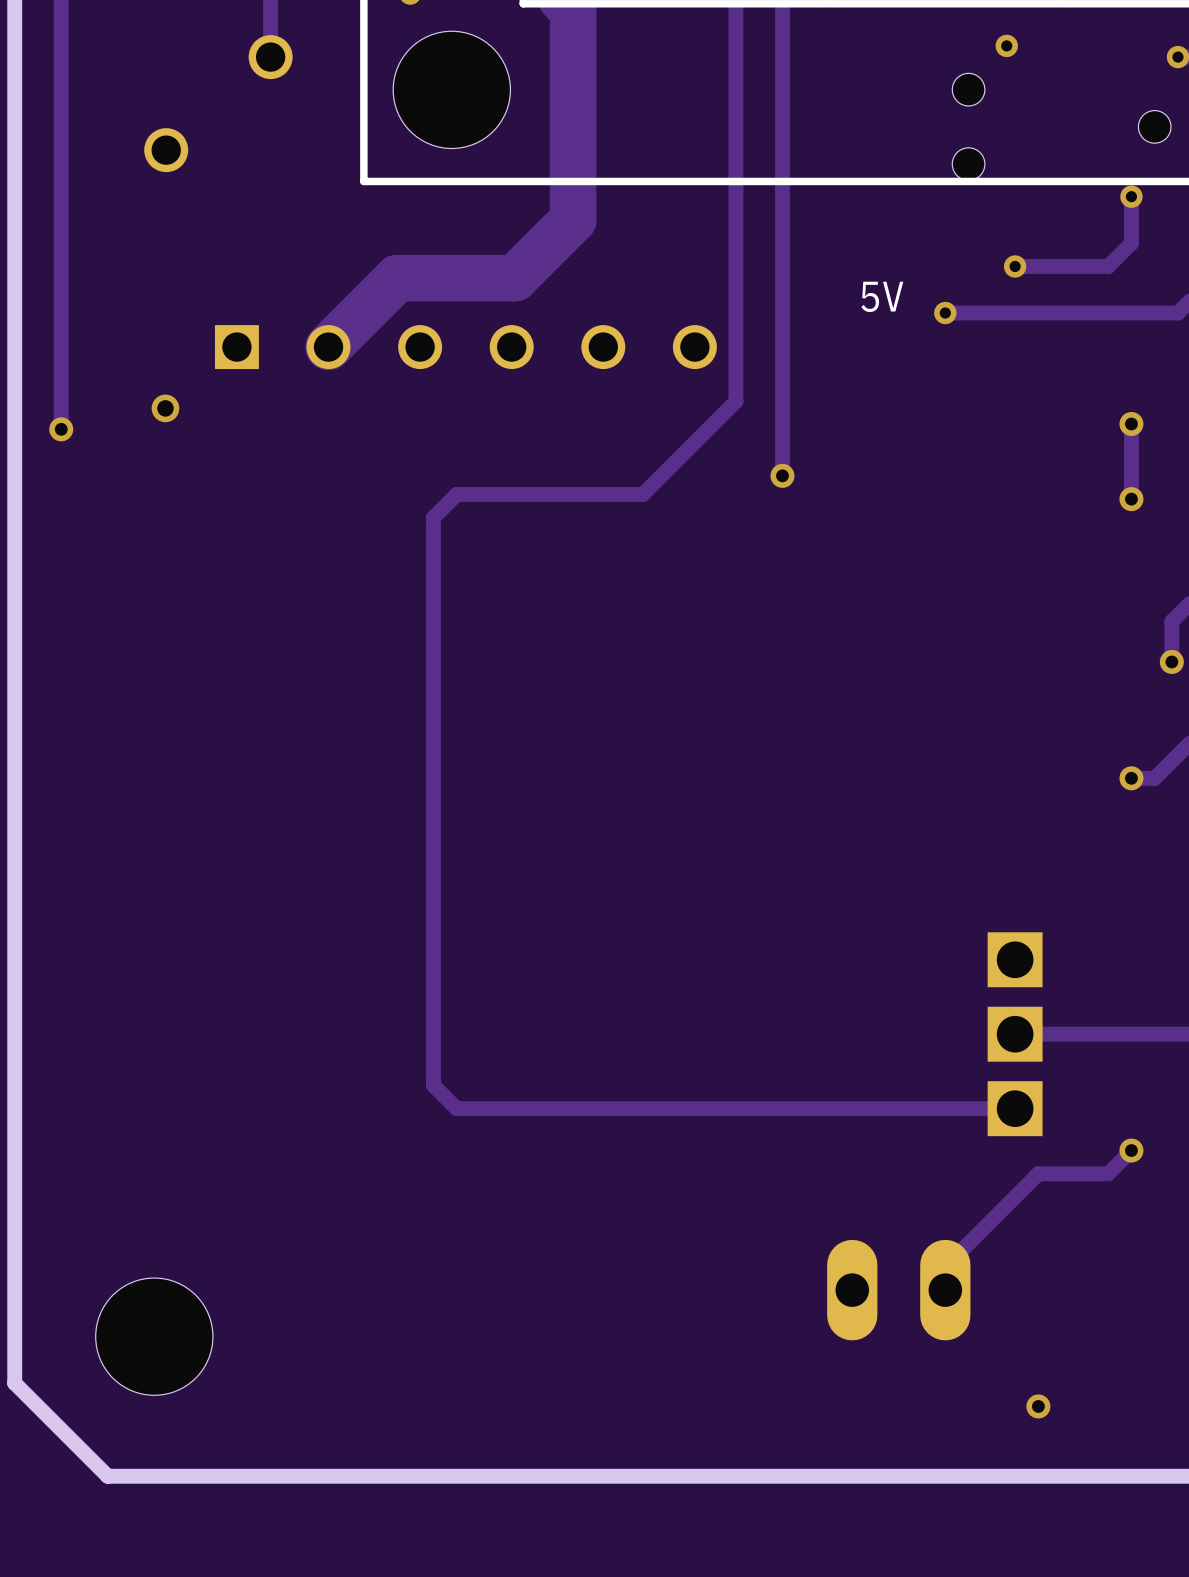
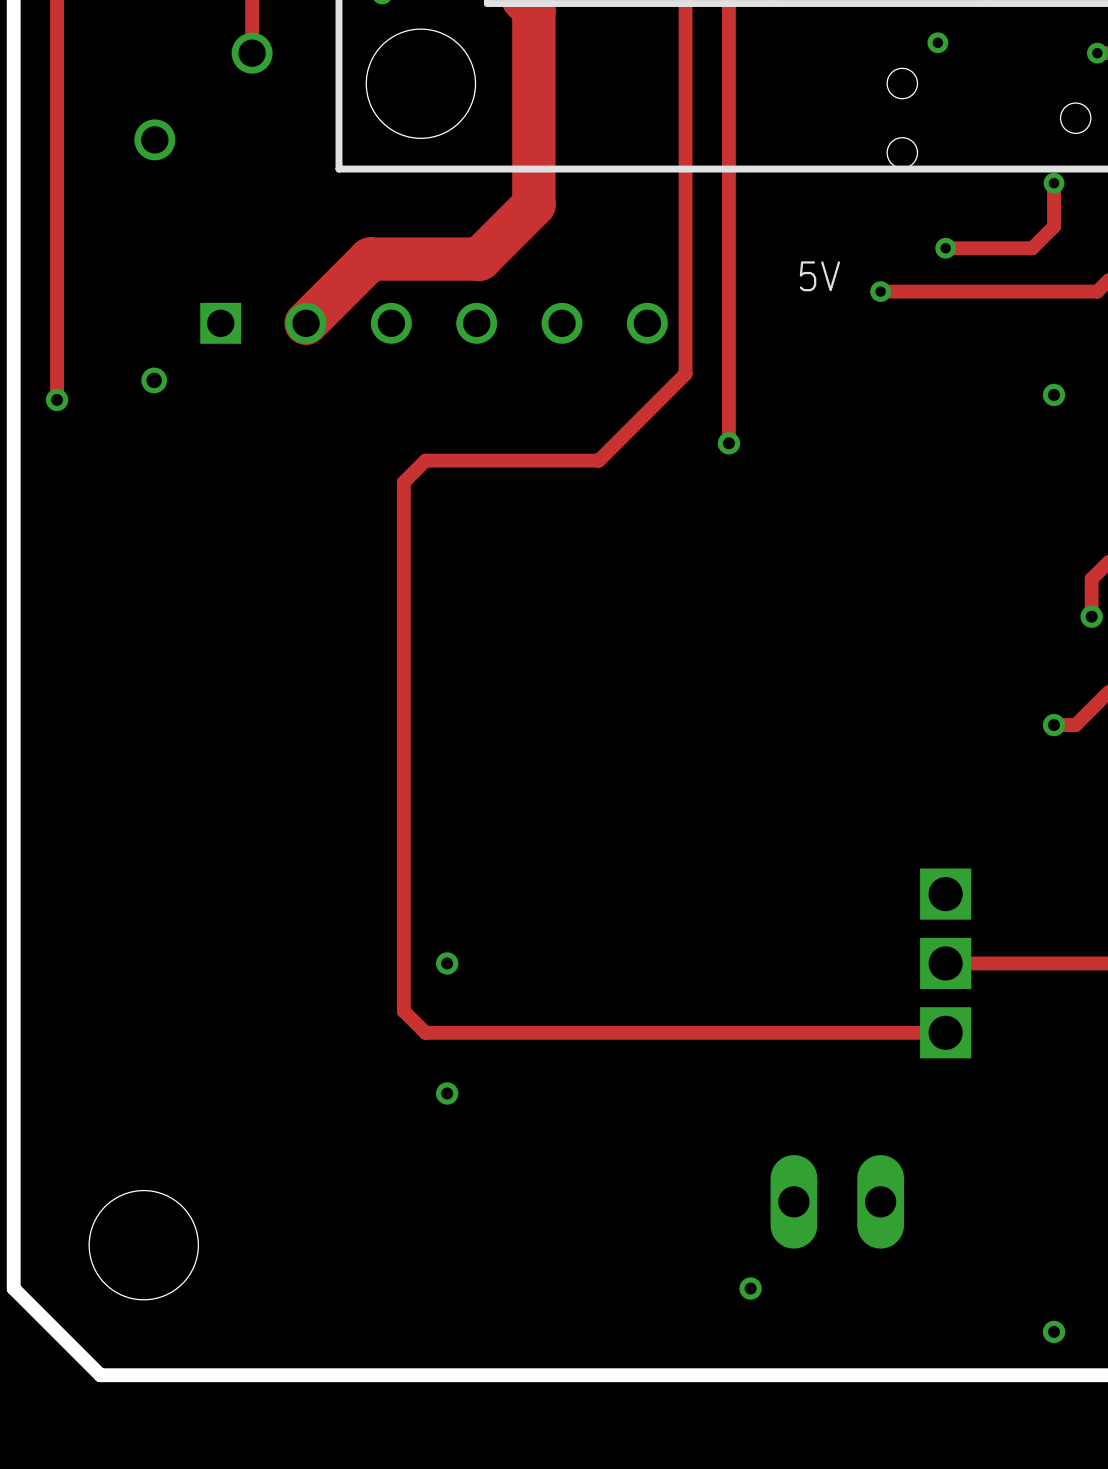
track: (1131, 423) (1131, 499) -> none
via: (1131, 499) -> none
via: none -> (447, 963)
track: (1131, 1150) (1108, 1173) (1038, 1173) (945, 1266) (945, 1290) -> none
via: (1131, 1150) -> none
via: none -> (447, 1093)
via: none -> (750, 1288)
via position: (1038, 1406) -> (1054, 1331)

